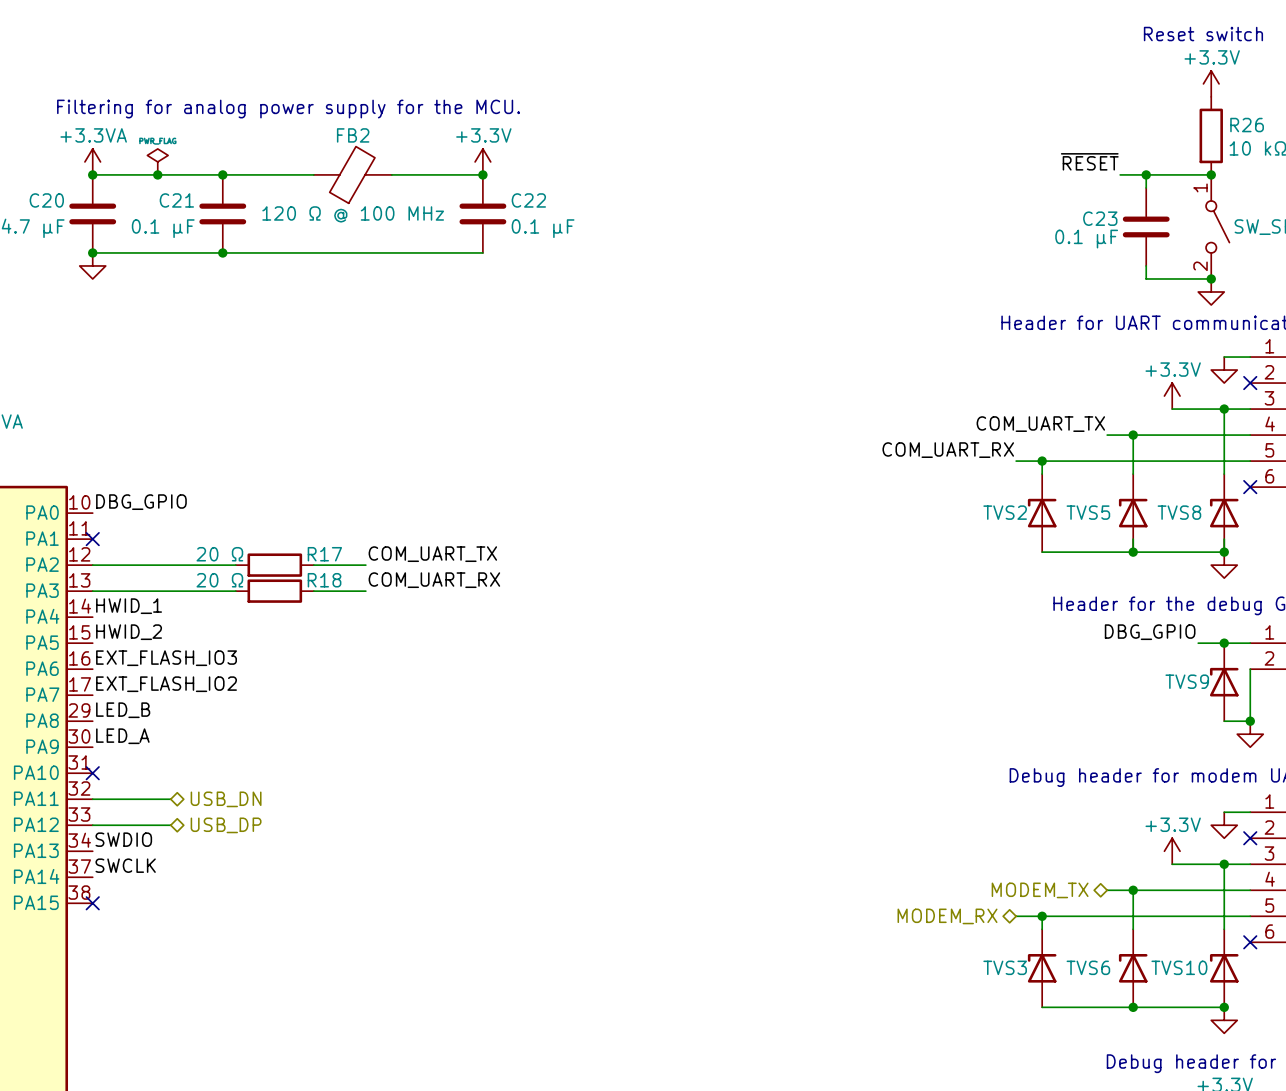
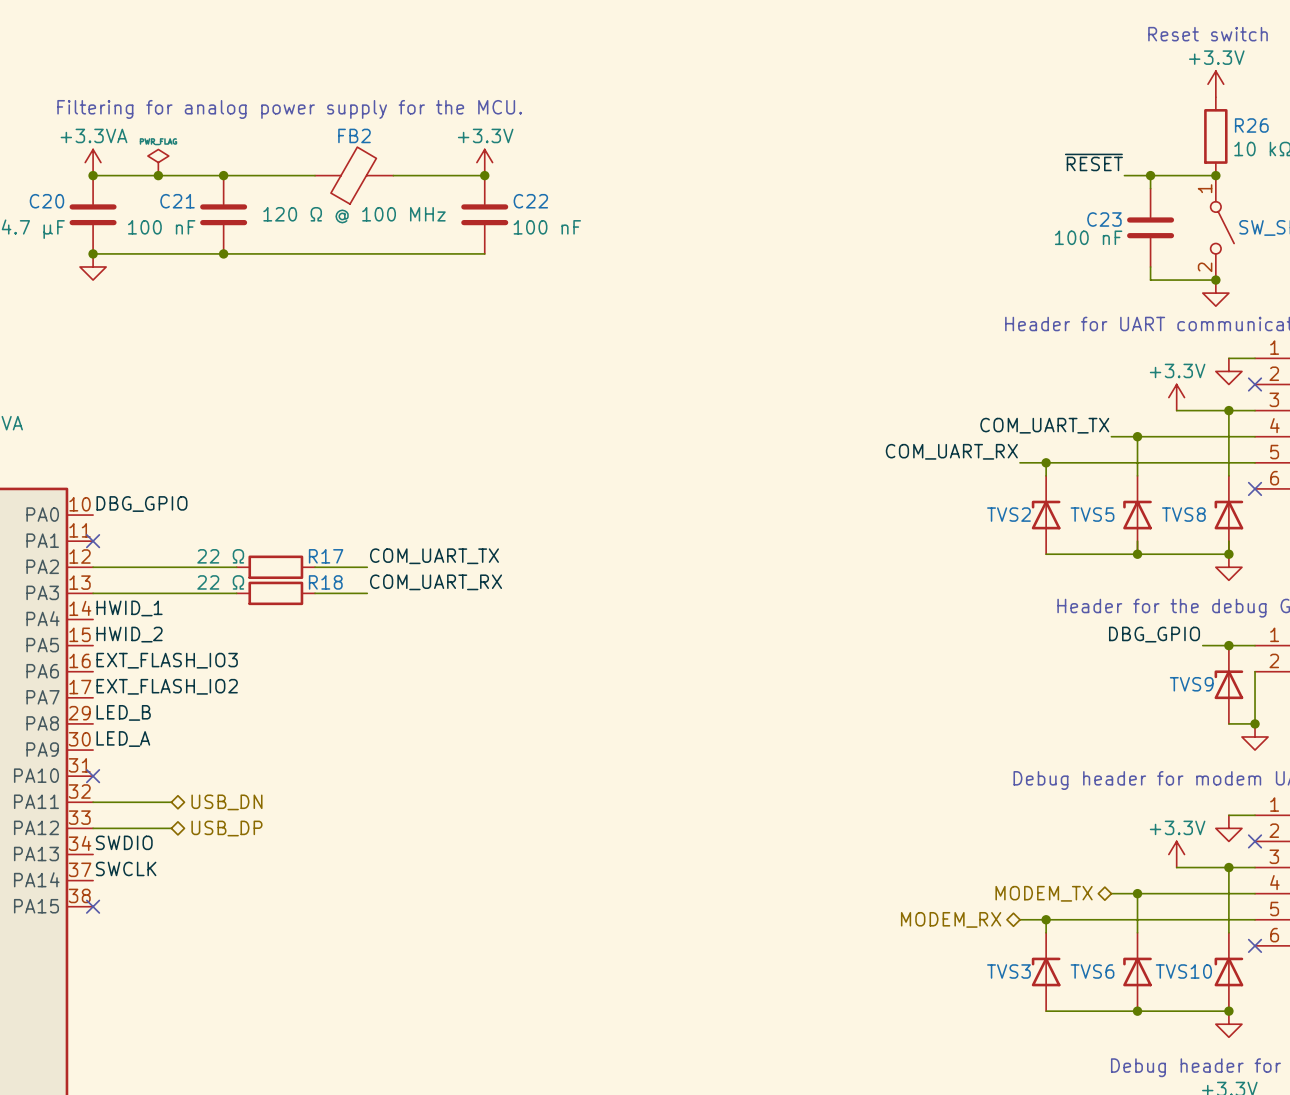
C21 value: 0.1 µF (163, 228) -> 100 nF (161, 227)
C22 value: 0.1 µF (543, 228) -> 100 nF (547, 227)
C23 value: 0.1 µF (1086, 239) -> 100 nF (1088, 237)
R17 value: 20 Ω (219, 554) -> 22 Ω (220, 556)
R18 value: 20 Ω (219, 580) -> 22 Ω (220, 582)

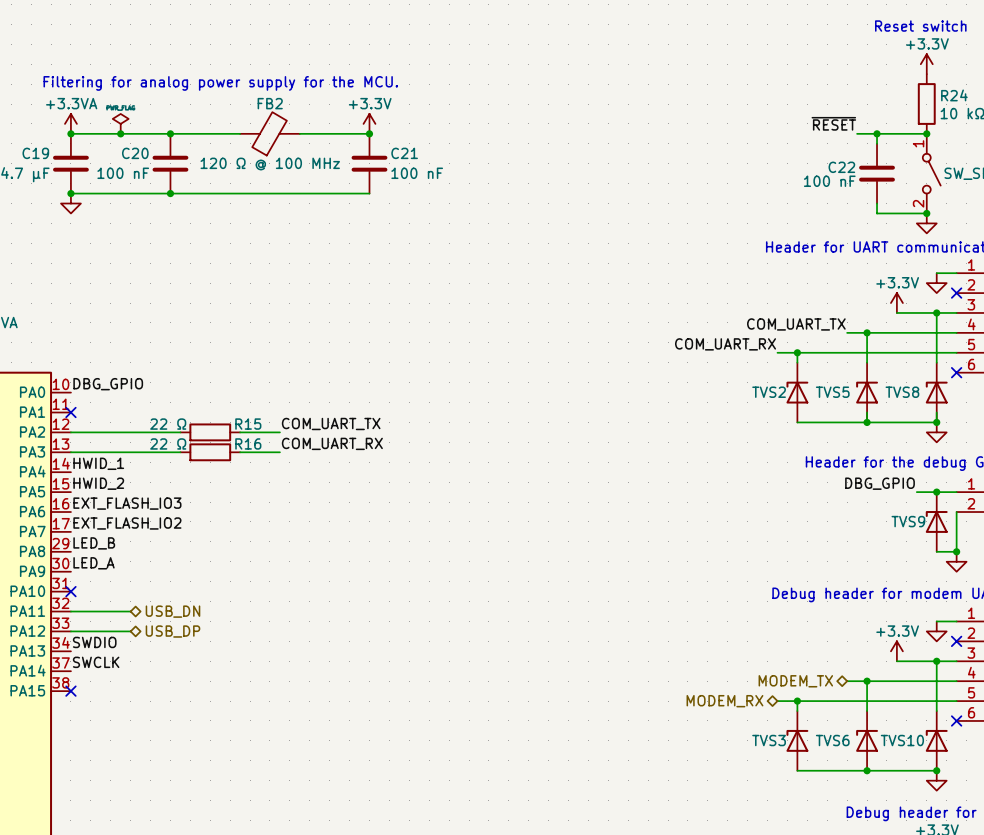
R26 name: R26 (1251, 125) -> R24 (954, 95)
C20 name: C20 (46, 201) -> C19 (35, 153)
C21 name: C21 (177, 201) -> C20 (135, 153)
C22 name: C22 (530, 201) -> C21 (404, 153)
C23 name: C23 (1104, 219) -> C22 (841, 167)
R17 name: R17 (326, 556) -> R15 (248, 424)
R18 name: R18 (325, 582) -> R16 (248, 443)

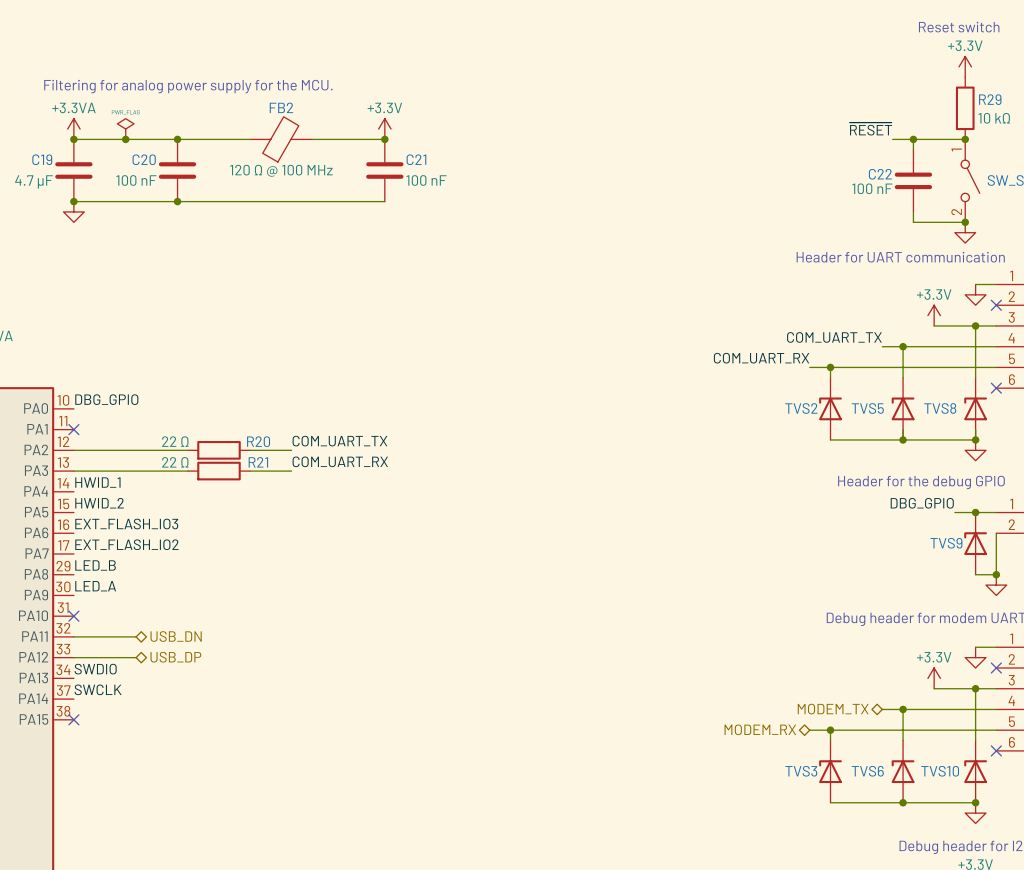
R24 name: R24 (954, 95) -> R29 (990, 99)
R15 name: R15 (248, 424) -> R20 (258, 441)
R16 name: R16 (248, 443) -> R21 (258, 462)

